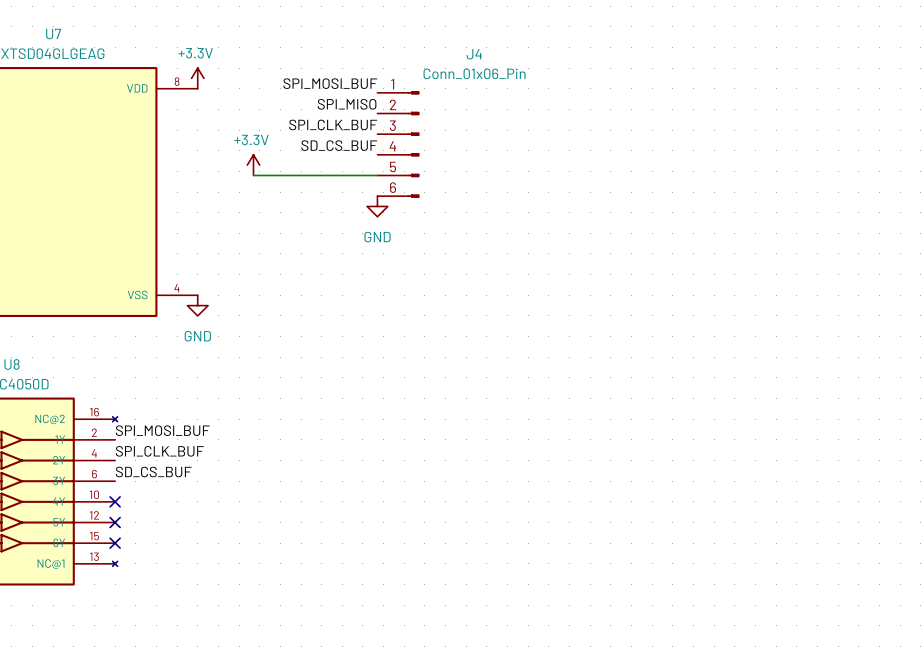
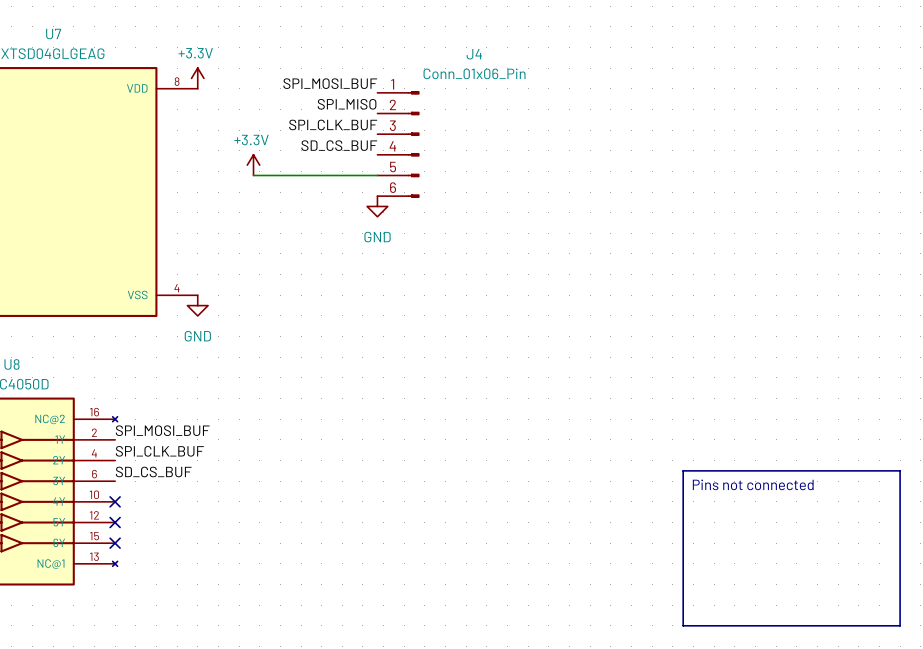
line: none -> (683, 470) (900, 470) (900, 625) (683, 625) (683, 470)
text: none -> Pins not connected (753, 484)

